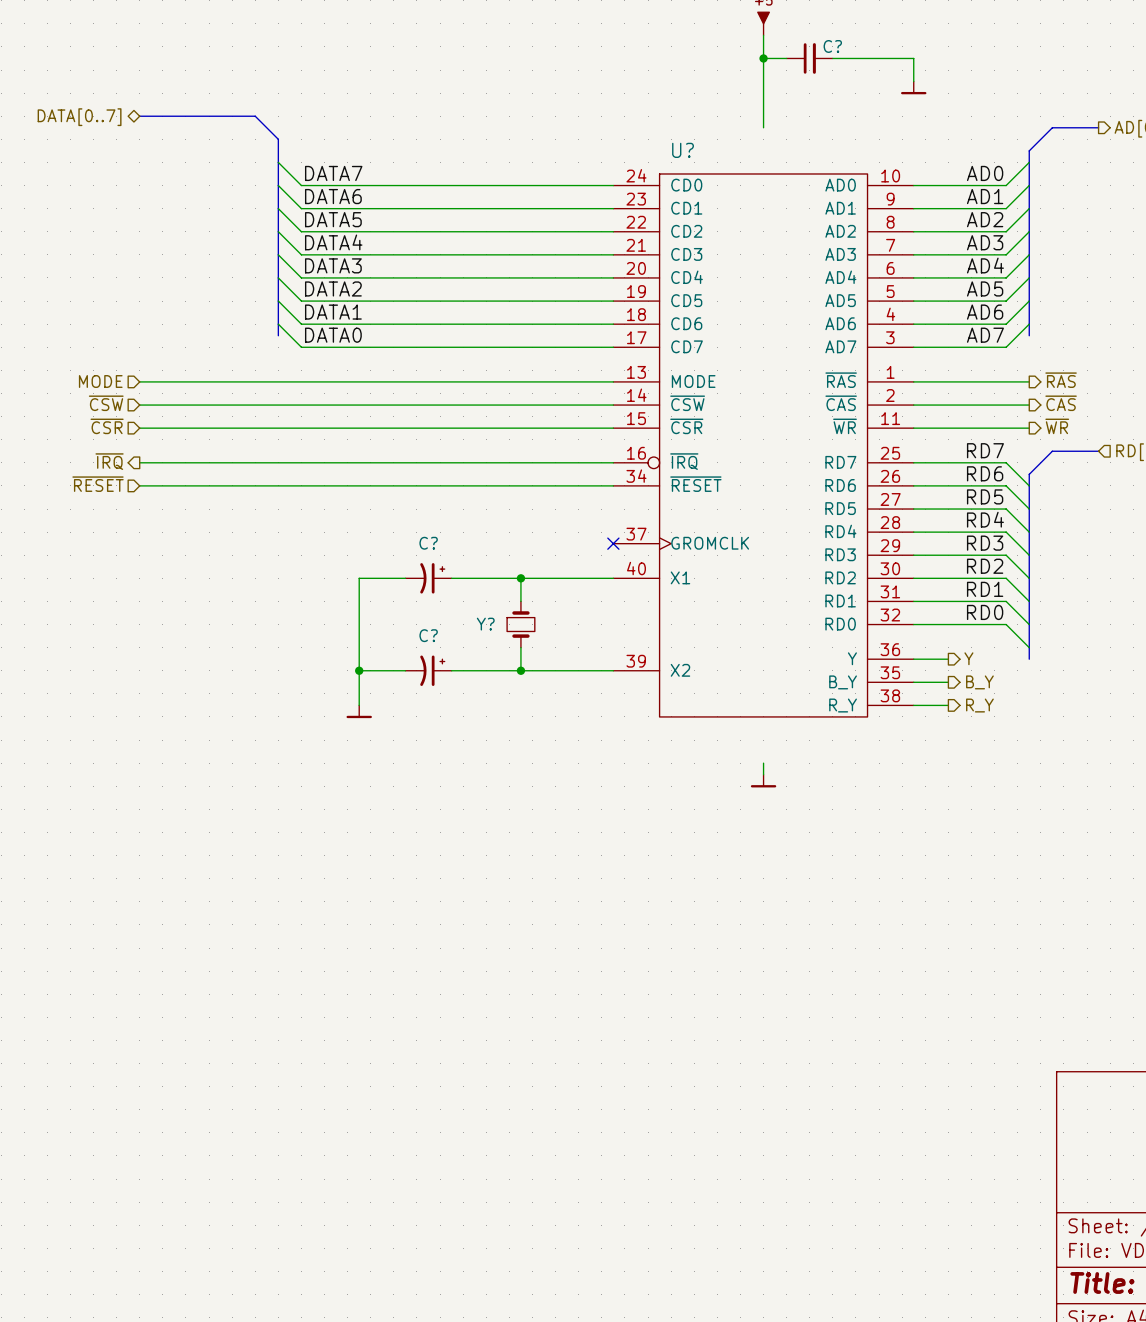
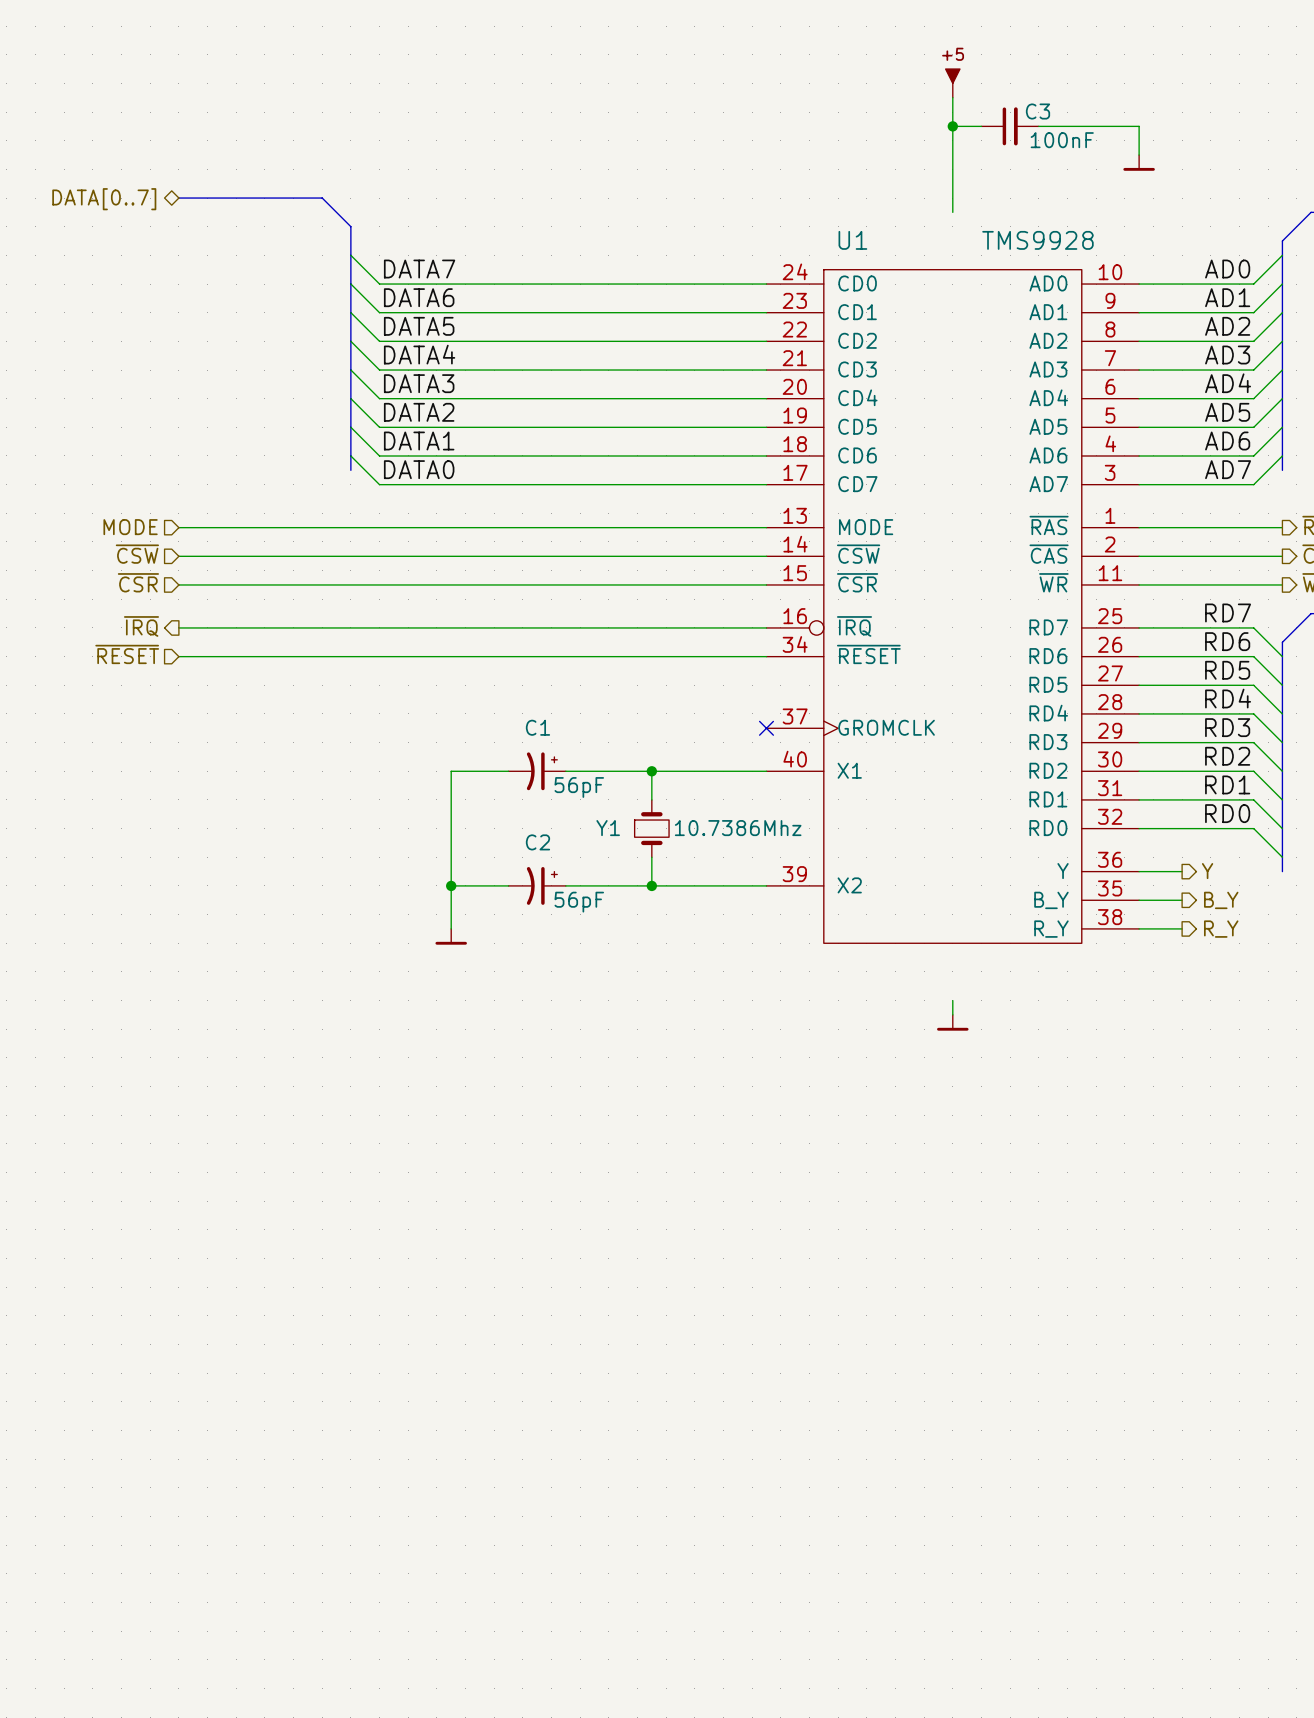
C? name: C? (832, 46) -> C3 (1038, 111)
C? value: none -> 100nF (1062, 140)
U? name: U? (683, 150) -> U1 (852, 240)
U? value: none -> TMS9928 (1037, 240)
C? name: C? (428, 543) -> C1 (537, 727)
C? value: none -> 56pF (579, 787)
Y? name: Y? (485, 624) -> Y1 (608, 828)
Y? value: none -> 10.7386Mhz (738, 828)
C? name: C? (428, 635) -> C2 (537, 842)
C? value: none -> 56pF (579, 902)

